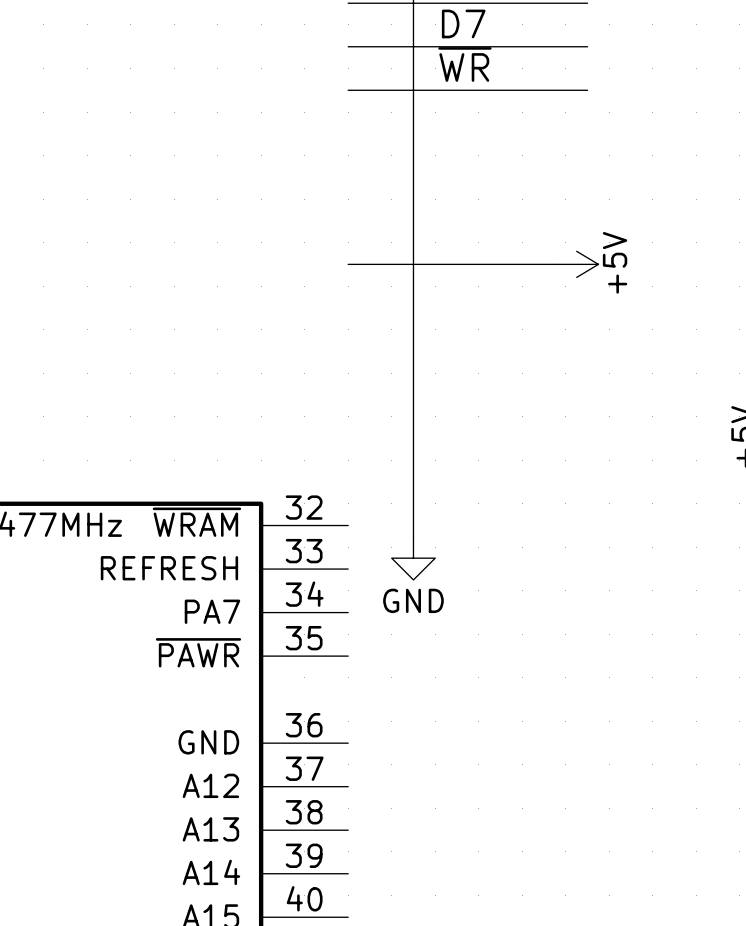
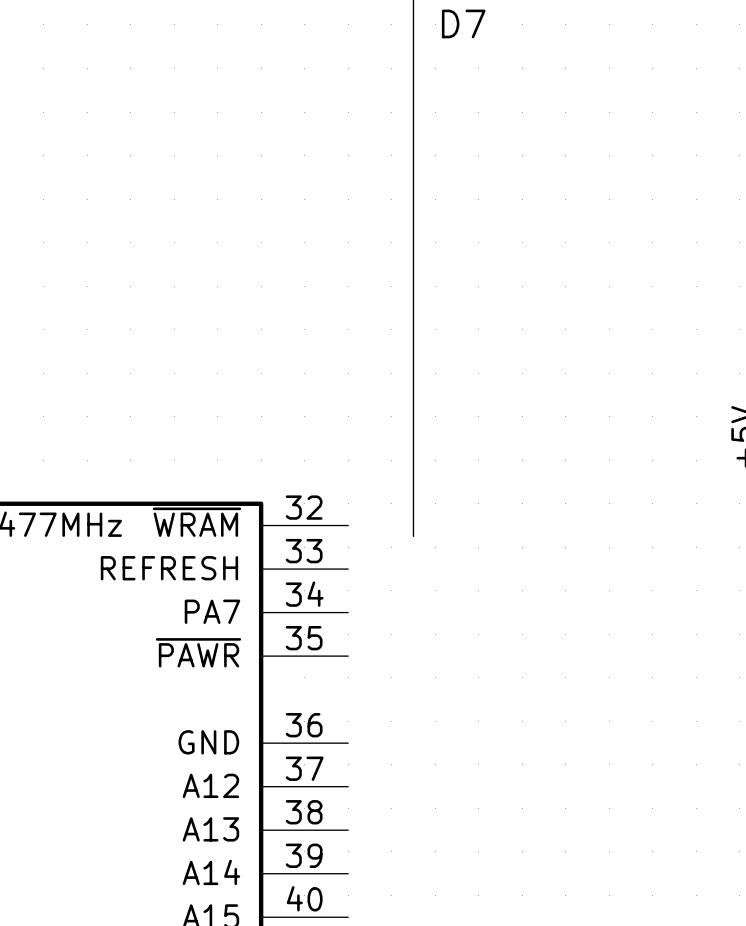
wire: (348, 3) (587, 3) -> none
wire: (348, 46) (587, 46) -> none
label: ~{WR} (464, 64) -> none
wire: (348, 90) (587, 90) -> none
wire: (348, 264) (554, 264) -> none
power symbol: +5V (576, 264) -> none
power symbol: GND (413, 558) -> none

